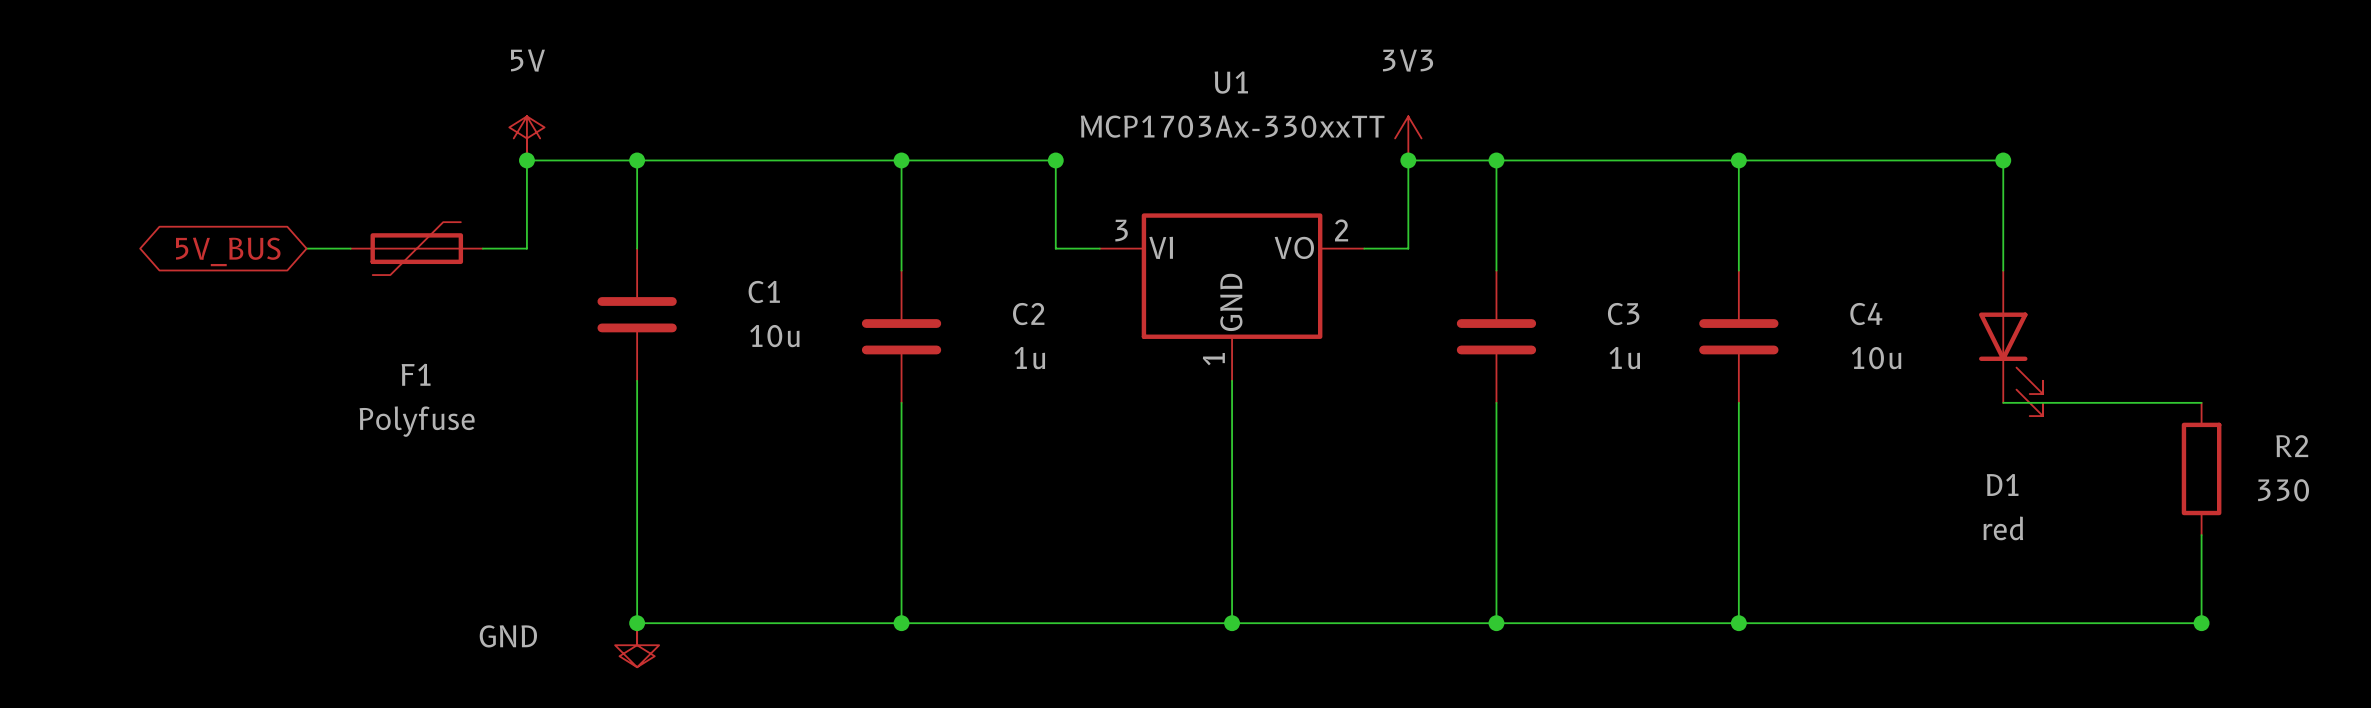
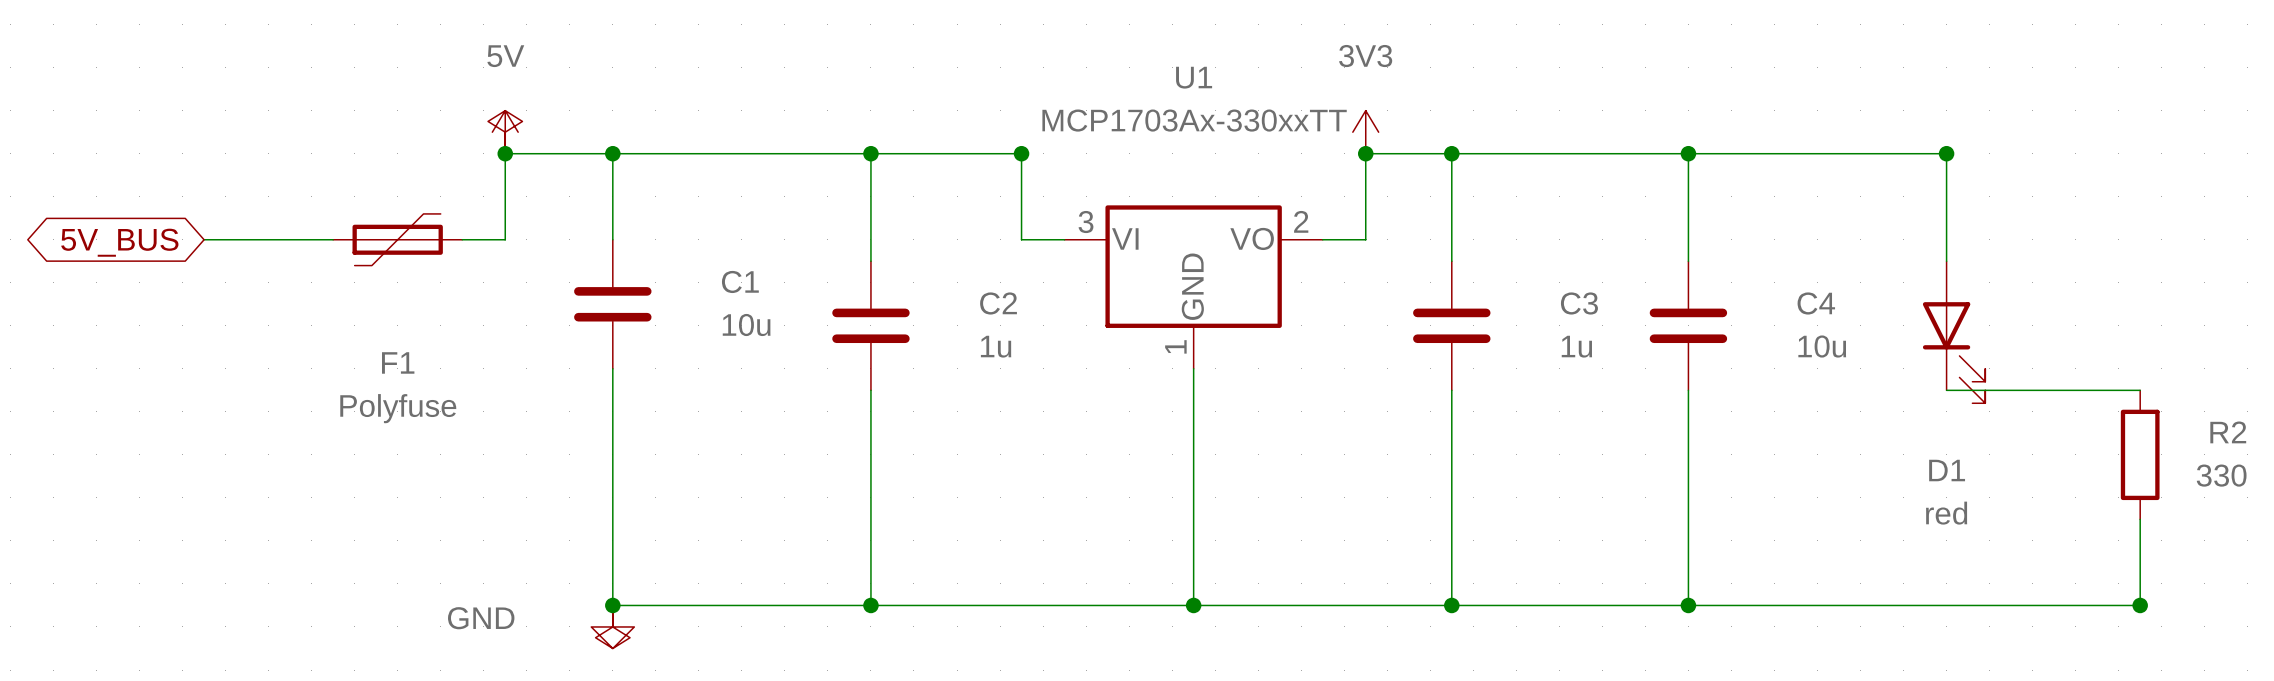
wire: none -> (204, 239) (290, 239)
global label position: 5V_BUS (228, 251) -> 5V_BUS (119, 242)

